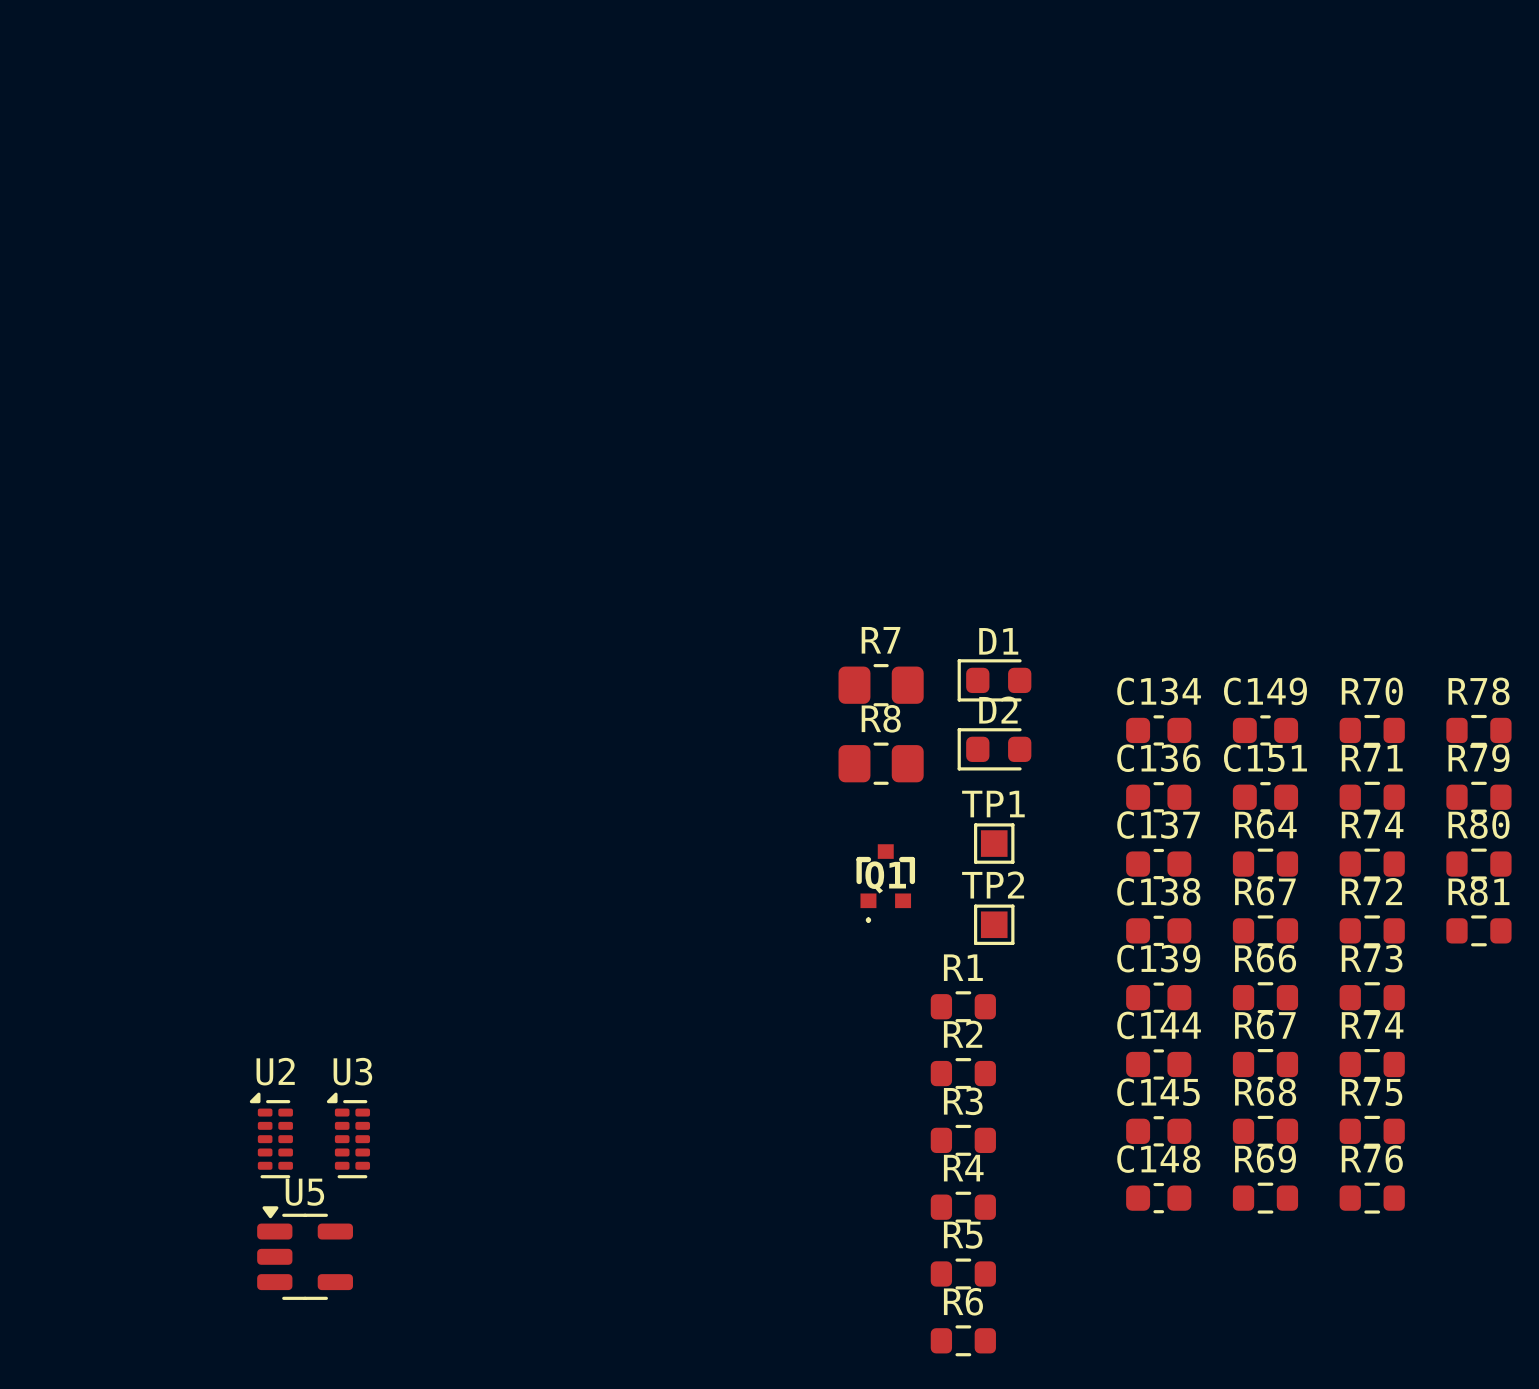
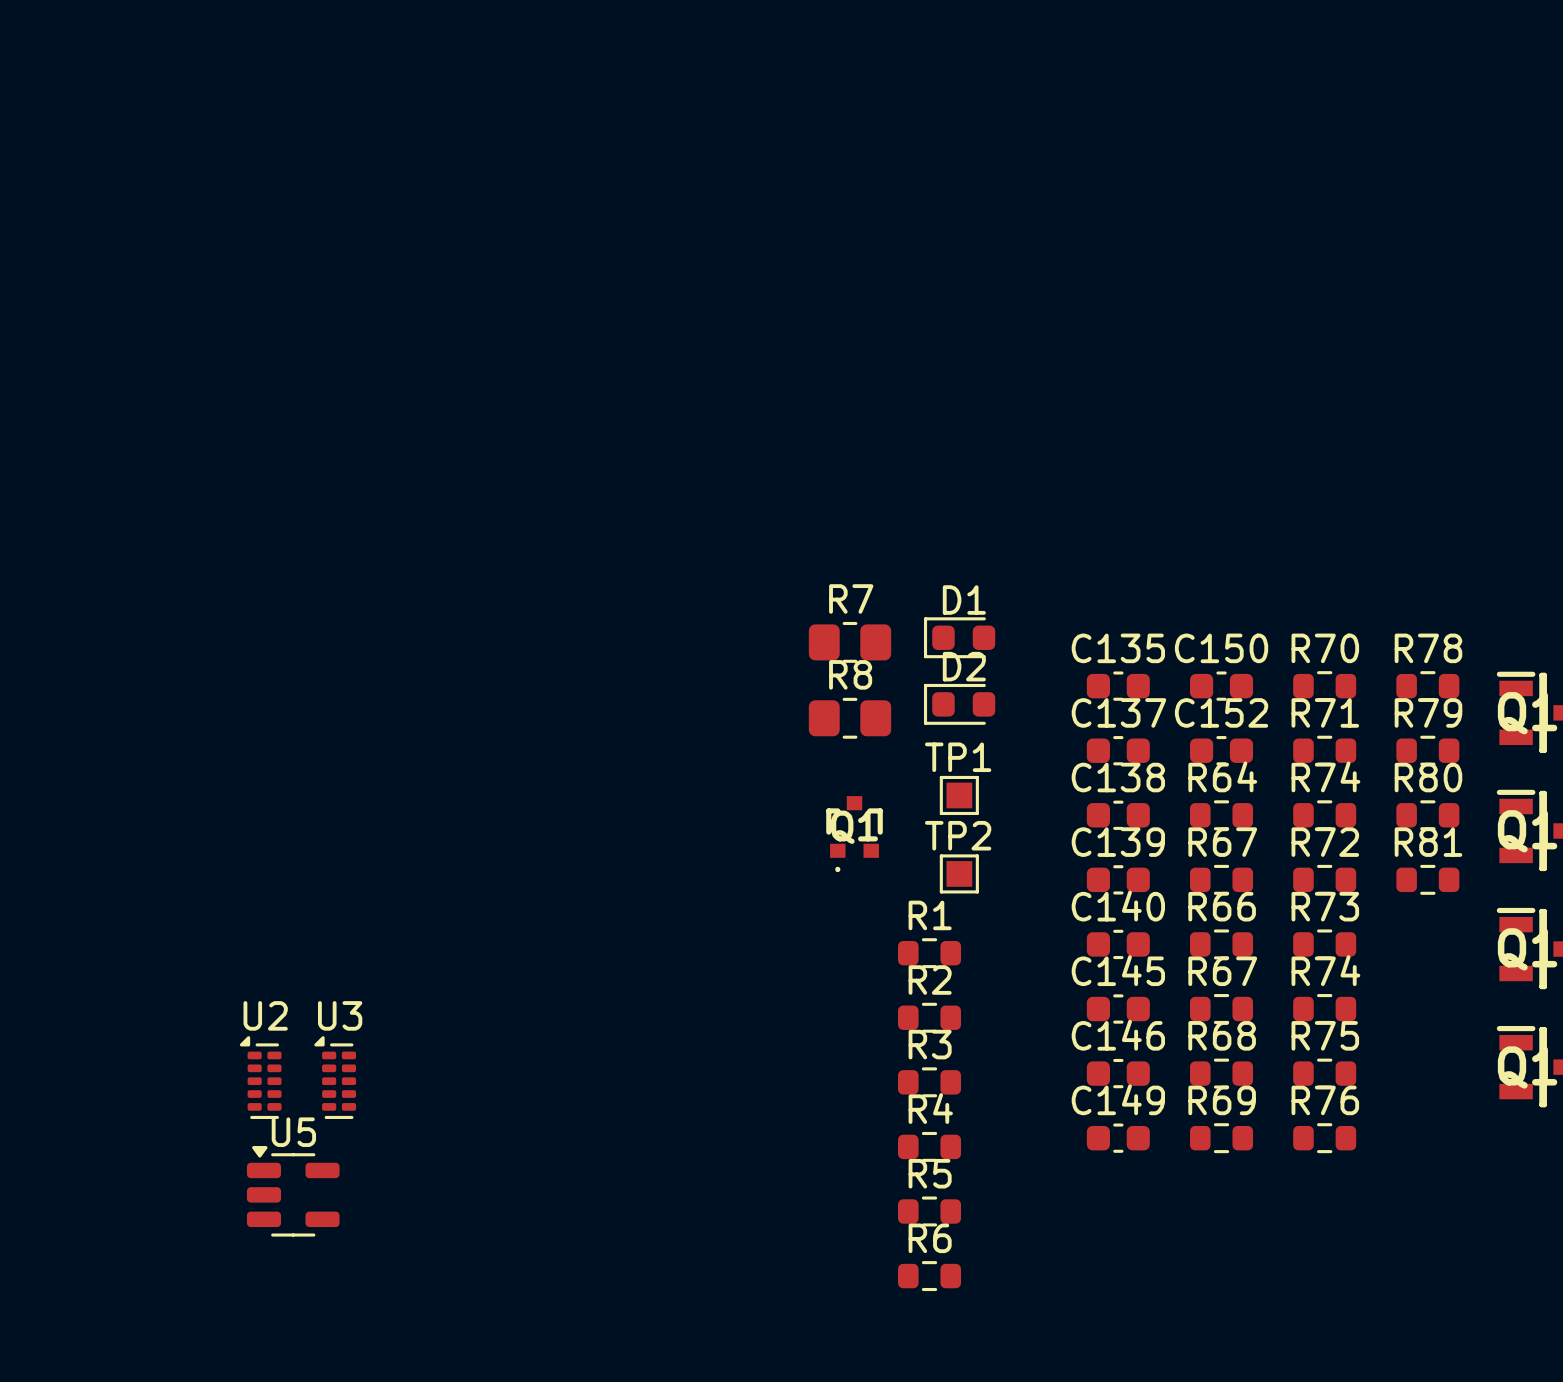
C134 name: C134 (1159, 691) -> C135 (1118, 648)
C149 name: C149 (1265, 691) -> C150 (1221, 648)
C136 name: C136 (1158, 758) -> C137 (1118, 712)
C151 name: C151 (1265, 758) -> C152 (1221, 712)
C137 name: C137 (1158, 825) -> C138 (1118, 777)
C138 name: C138 (1158, 891) -> C139 (1118, 842)
C139 name: C139 (1158, 958) -> C140 (1118, 906)
C144 name: C144 (1159, 1025) -> C145 (1118, 970)
C145 name: C145 (1158, 1092) -> C146 (1118, 1035)
C148 name: C148 (1158, 1159) -> C149 (1118, 1099)

